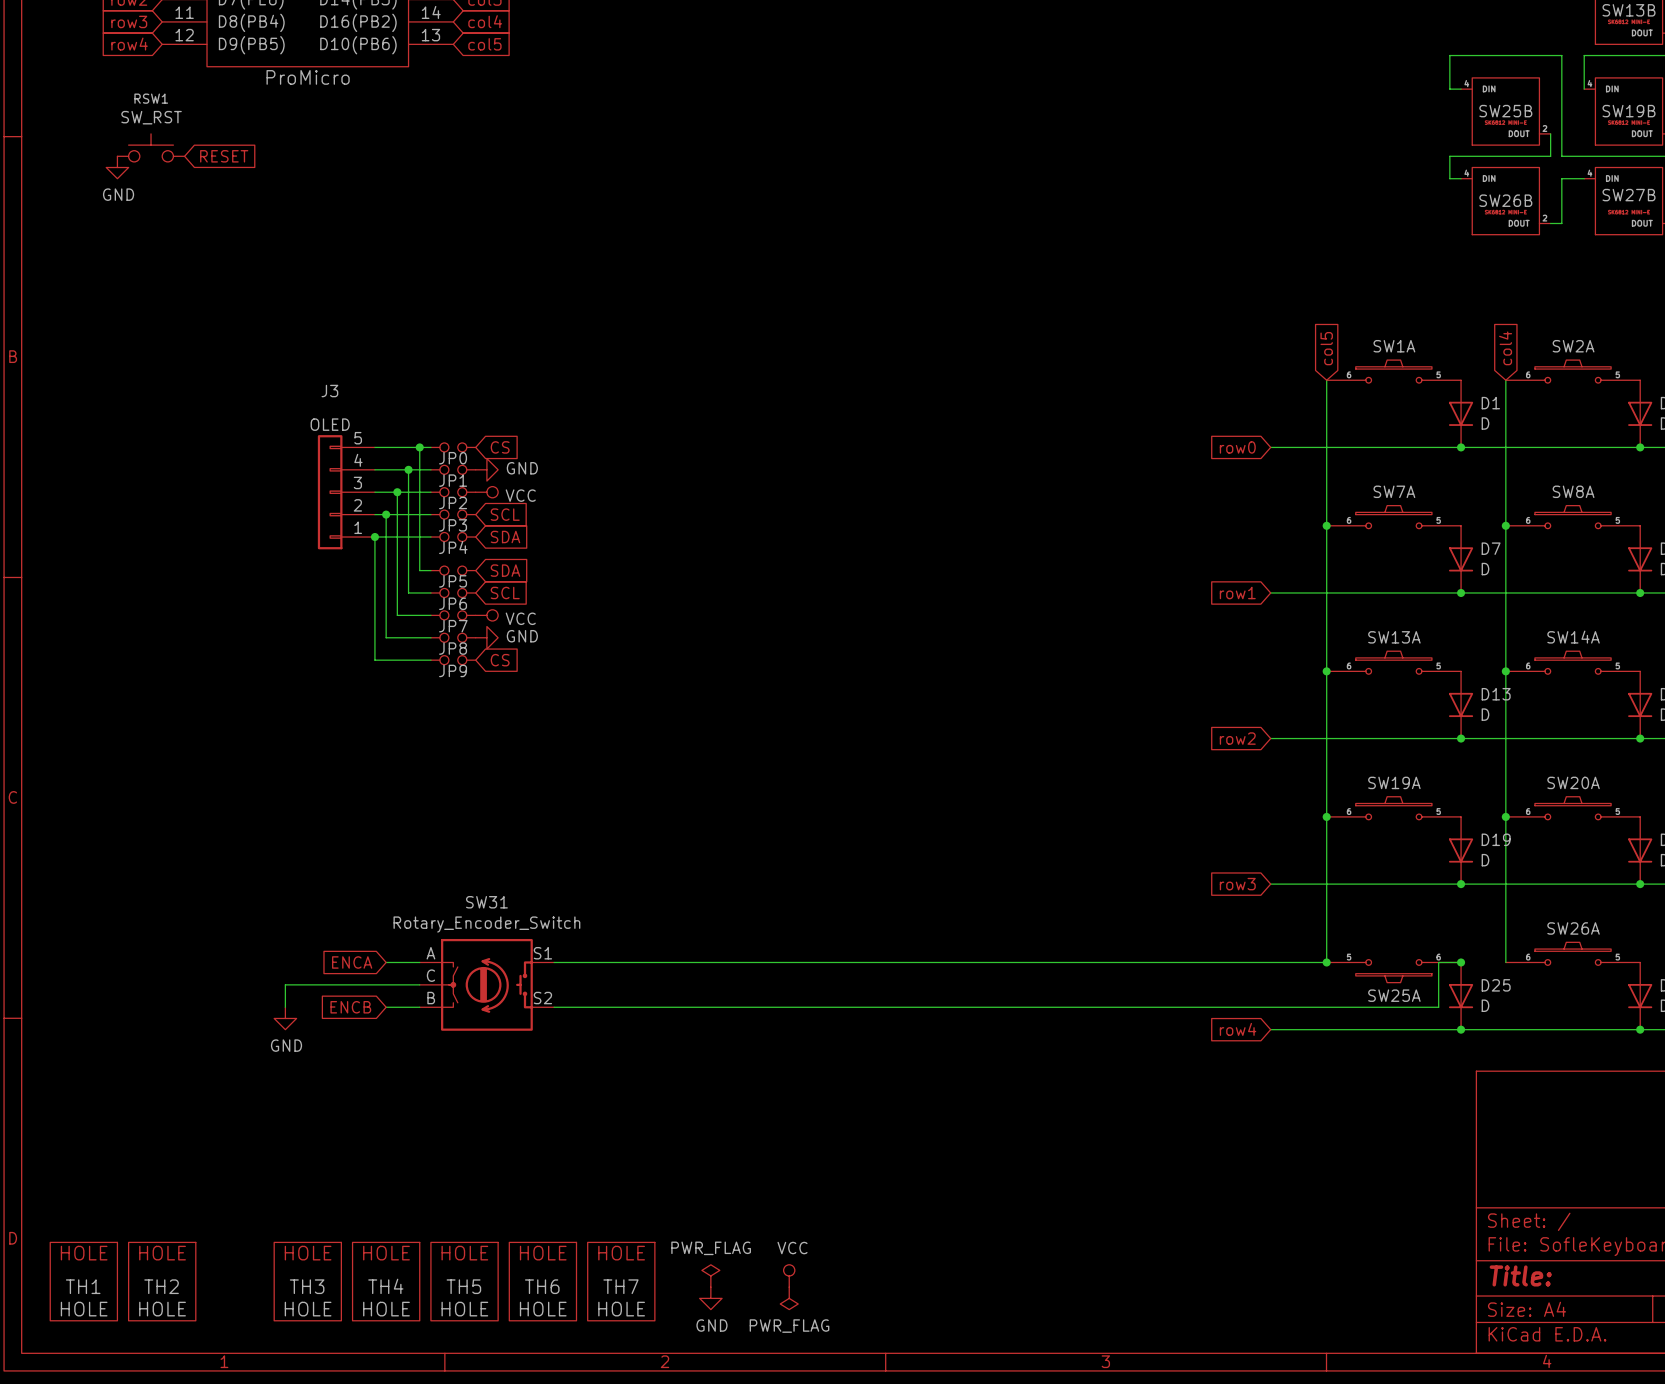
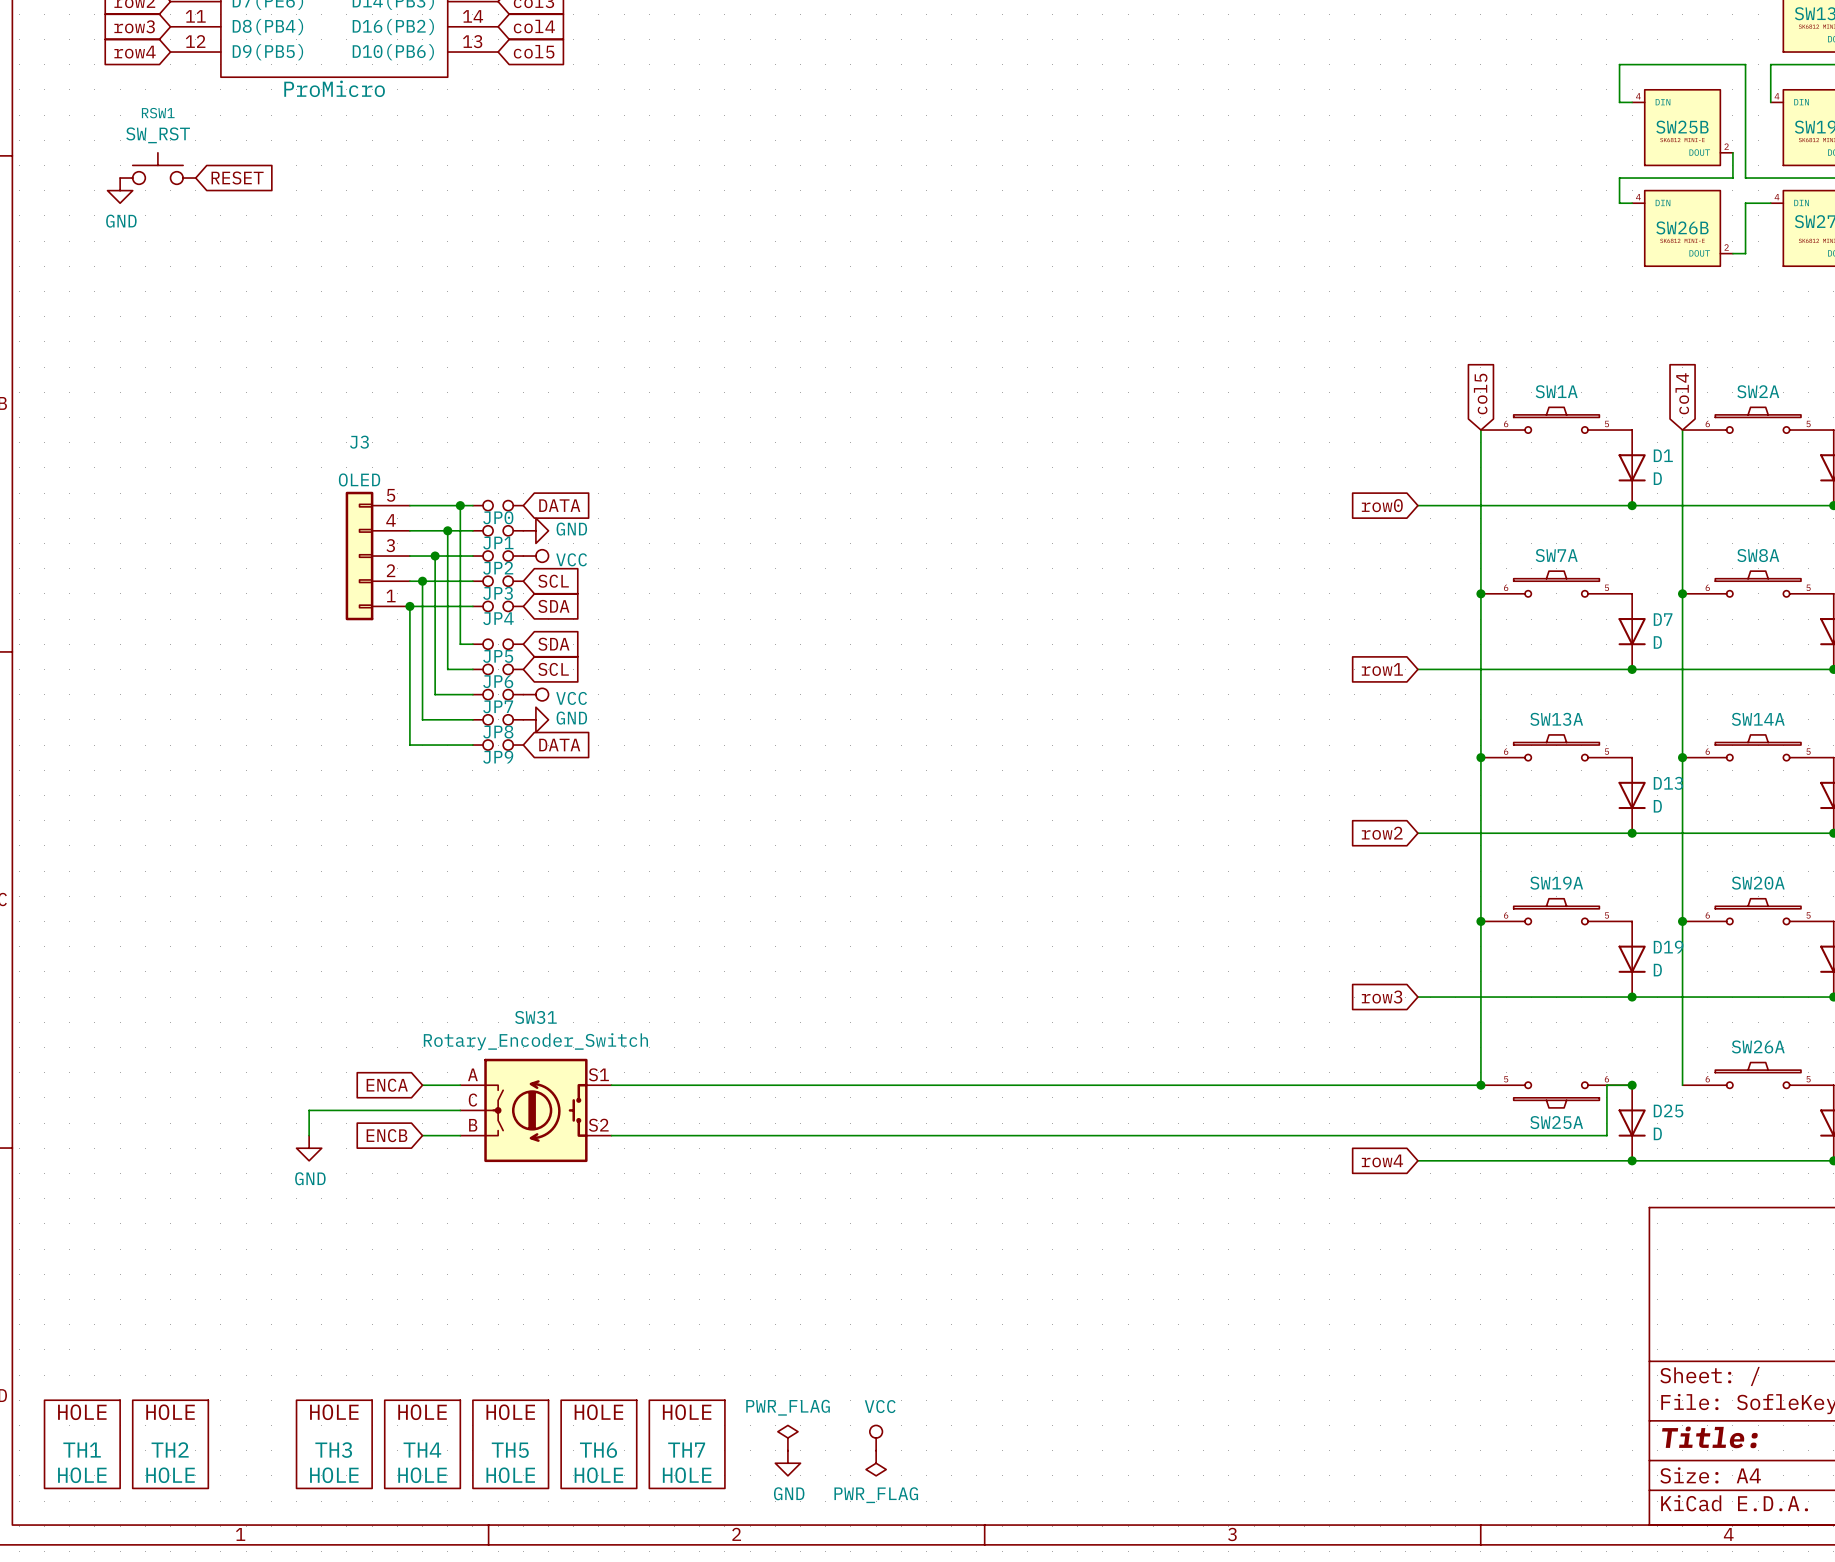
global label: CS (500, 447) -> DATA (559, 505)
global label: CS (500, 660) -> DATA (559, 745)

